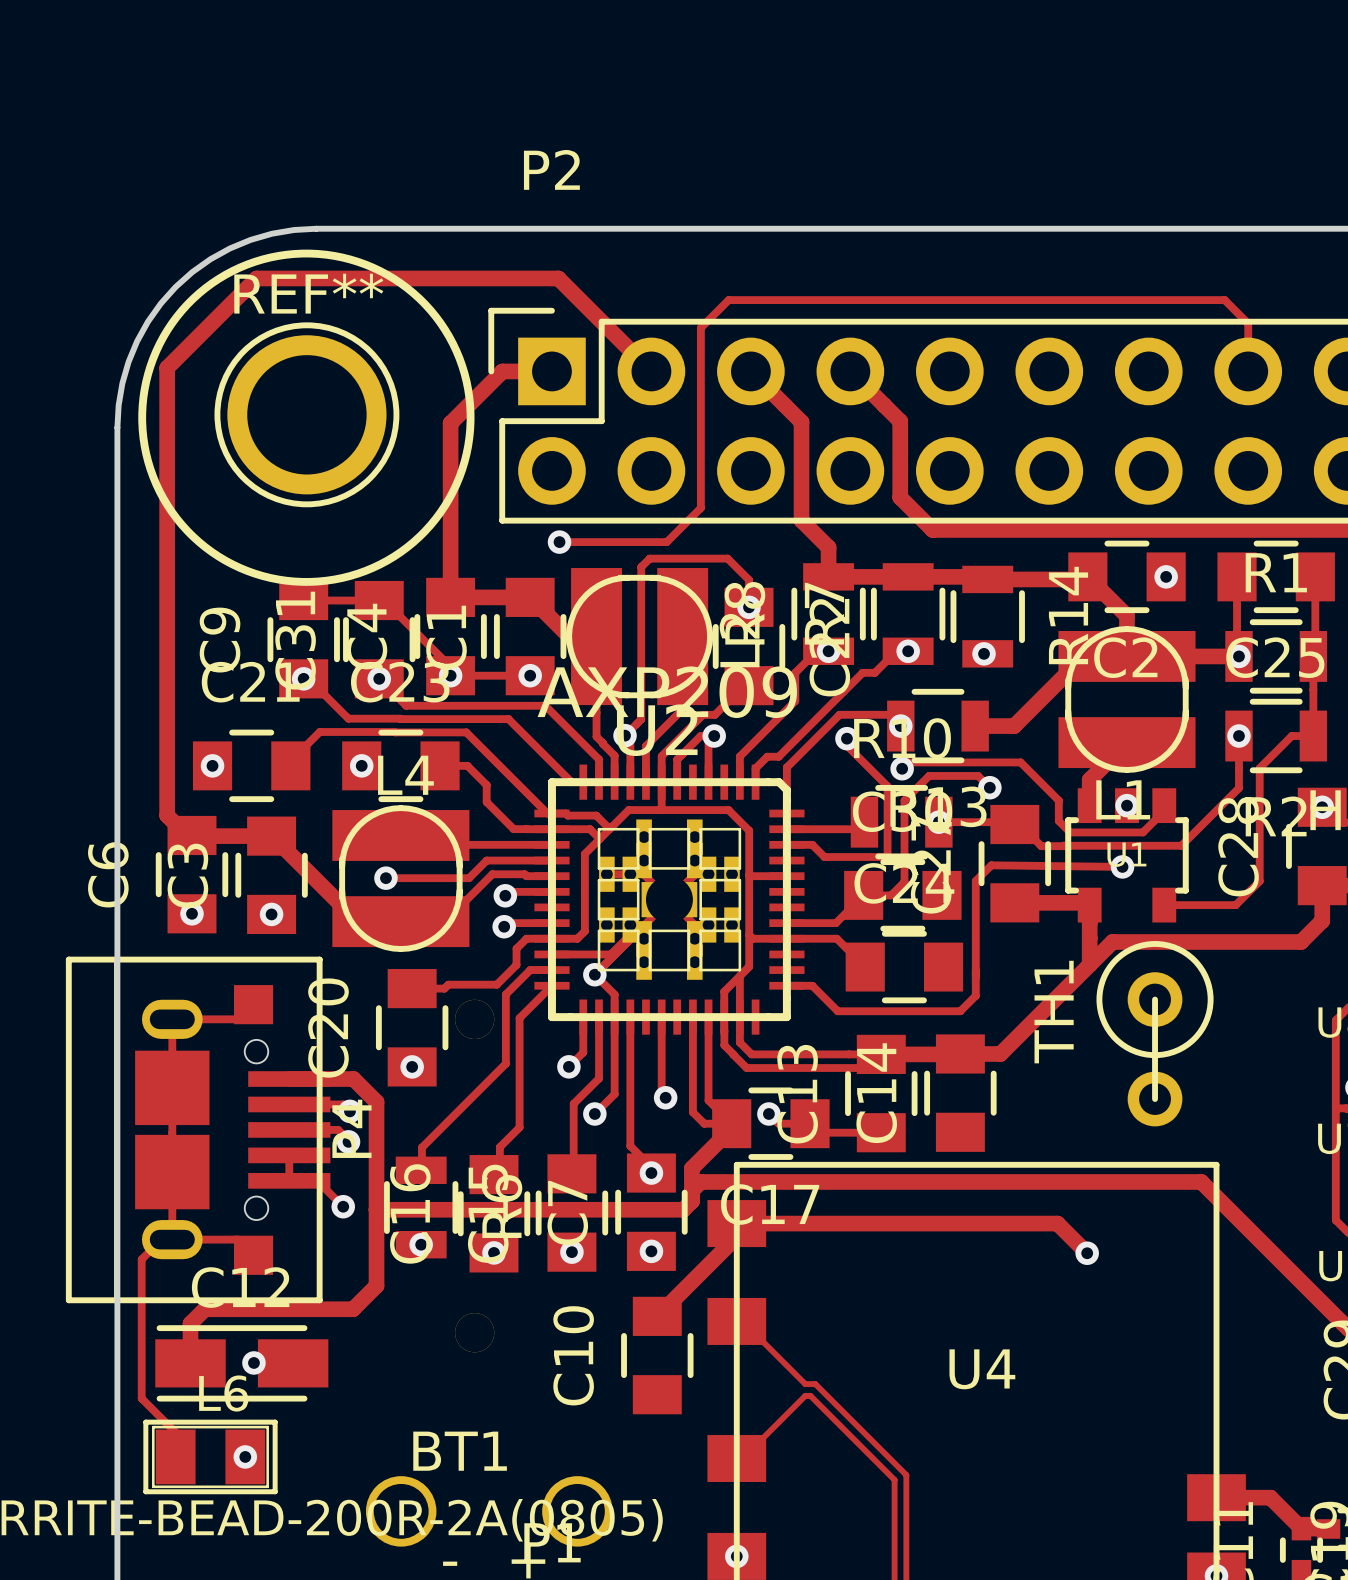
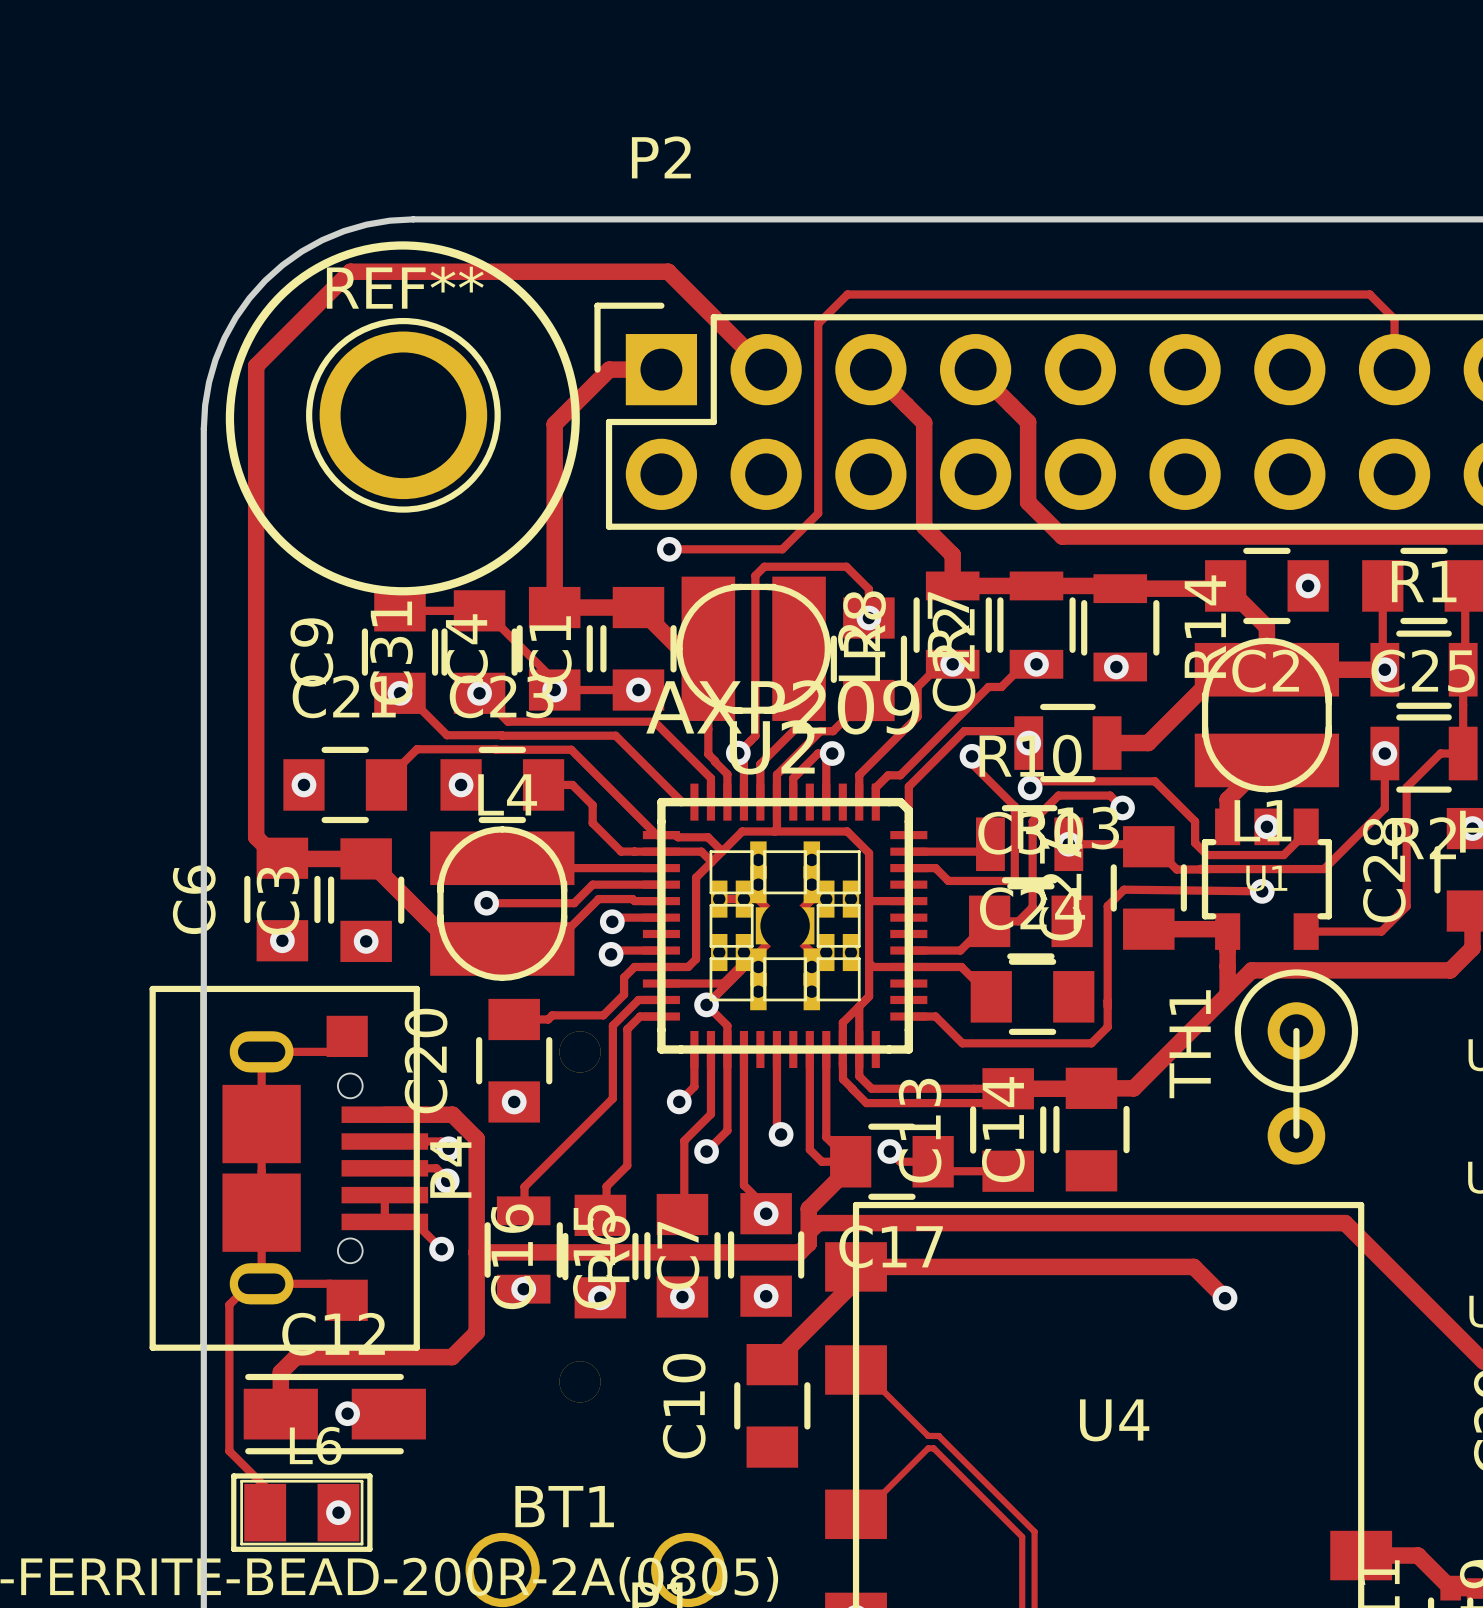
track: (551, 985) (519, 1018) -> (661, 1016) (640, 1016) (627, 1029) (627, 1050)

